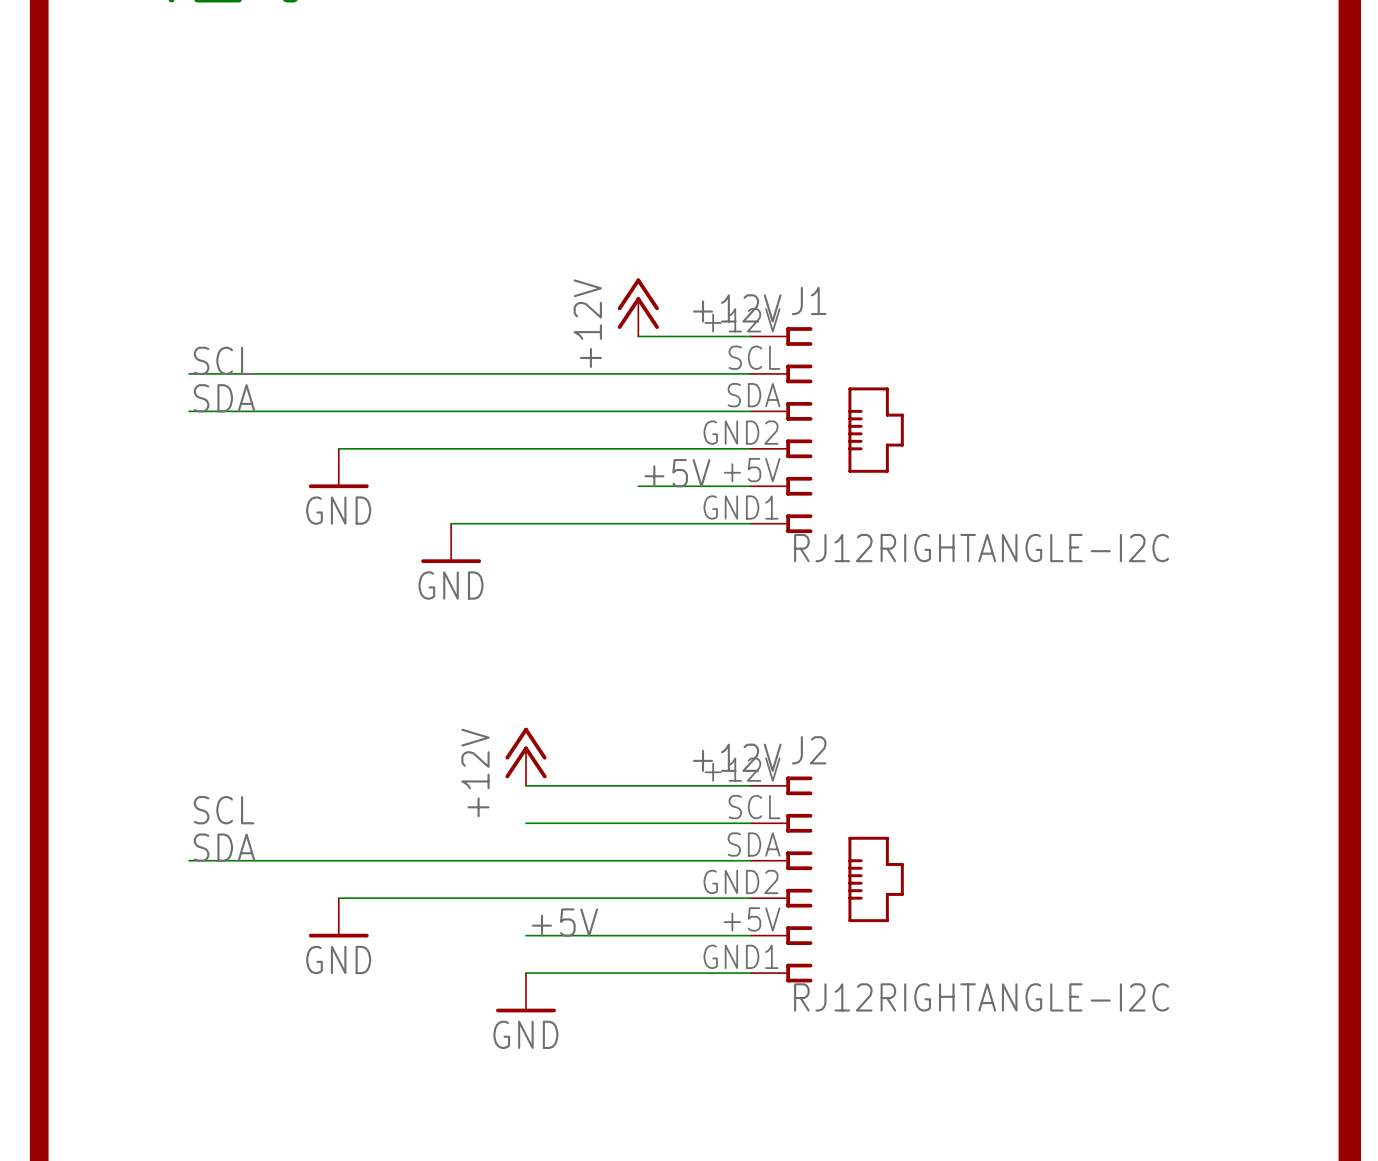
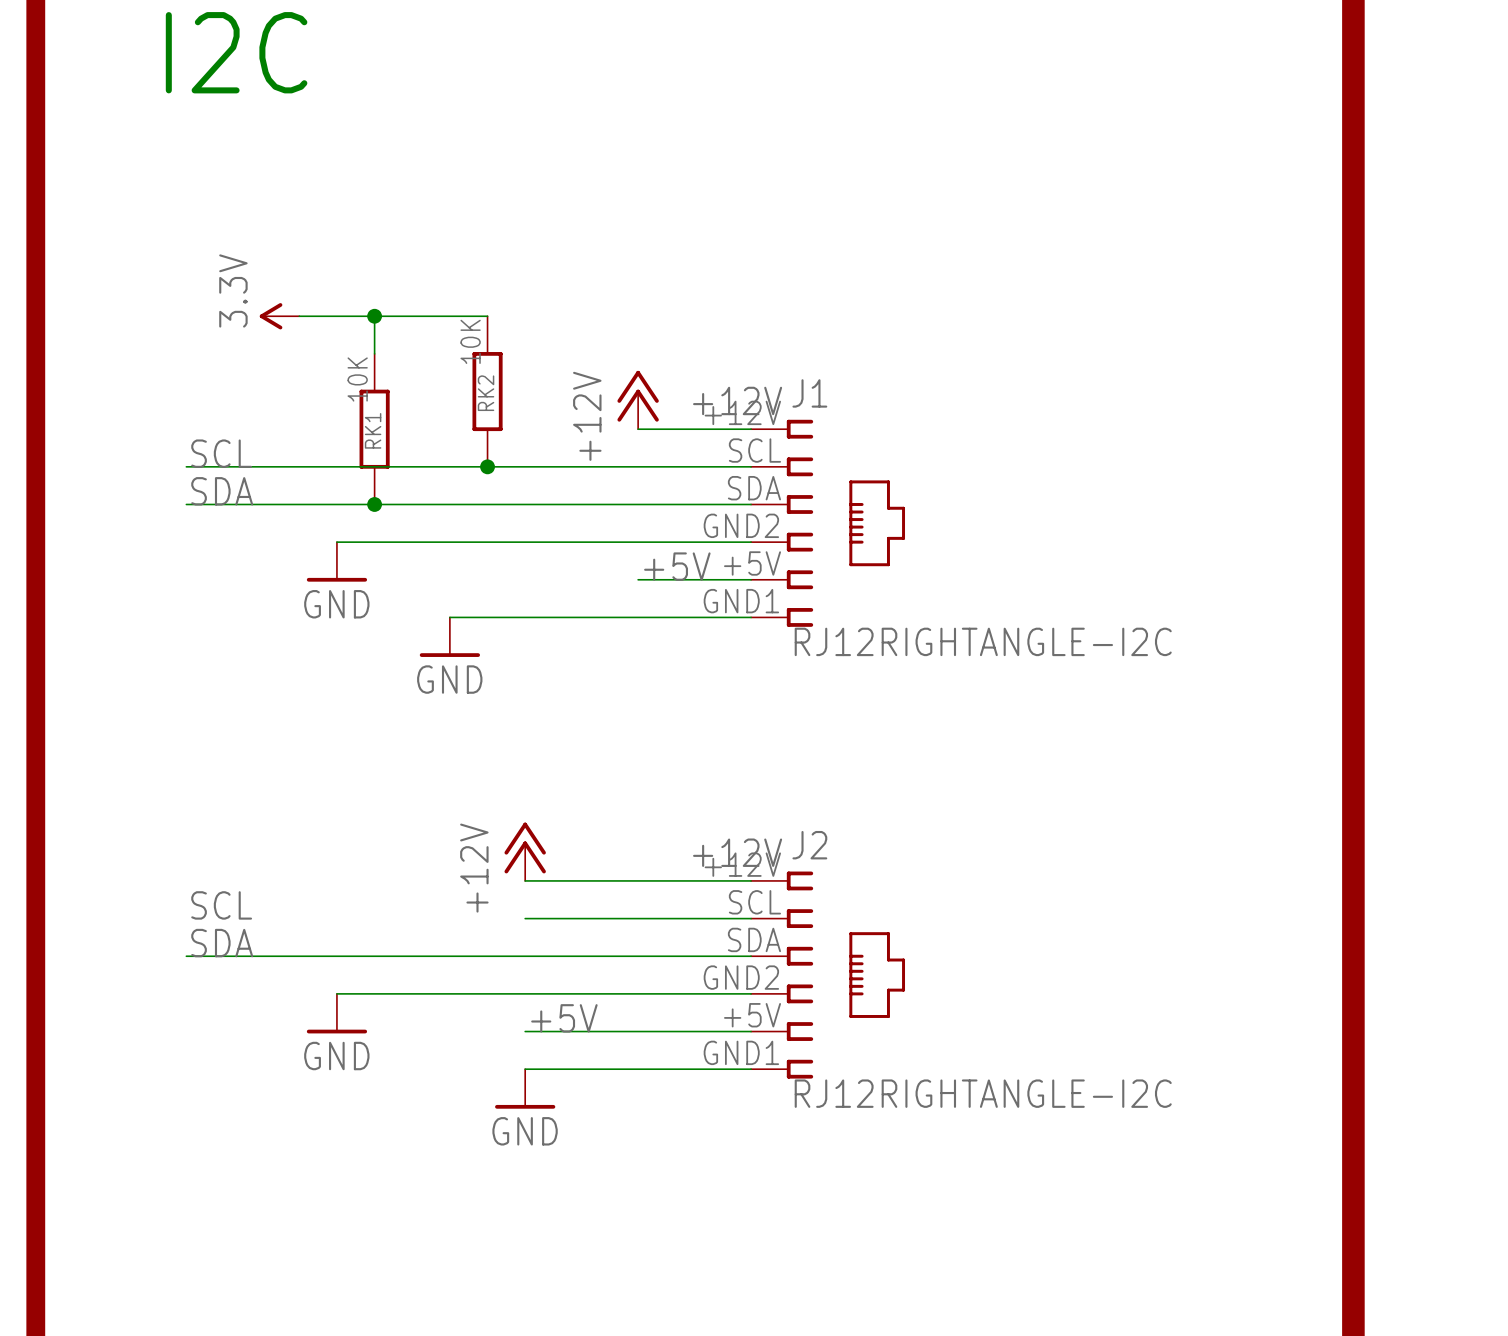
power symbol: none -> 3.3V (279, 316)
wire: none -> (299, 316) (487, 316)
wire: none -> (374, 316) (374, 353)
junction: none -> (374, 316)
RK2: none -> 10K (487, 391)
RK1: none -> 10K (374, 429)
junction: none -> (487, 466)
junction: none -> (374, 504)

